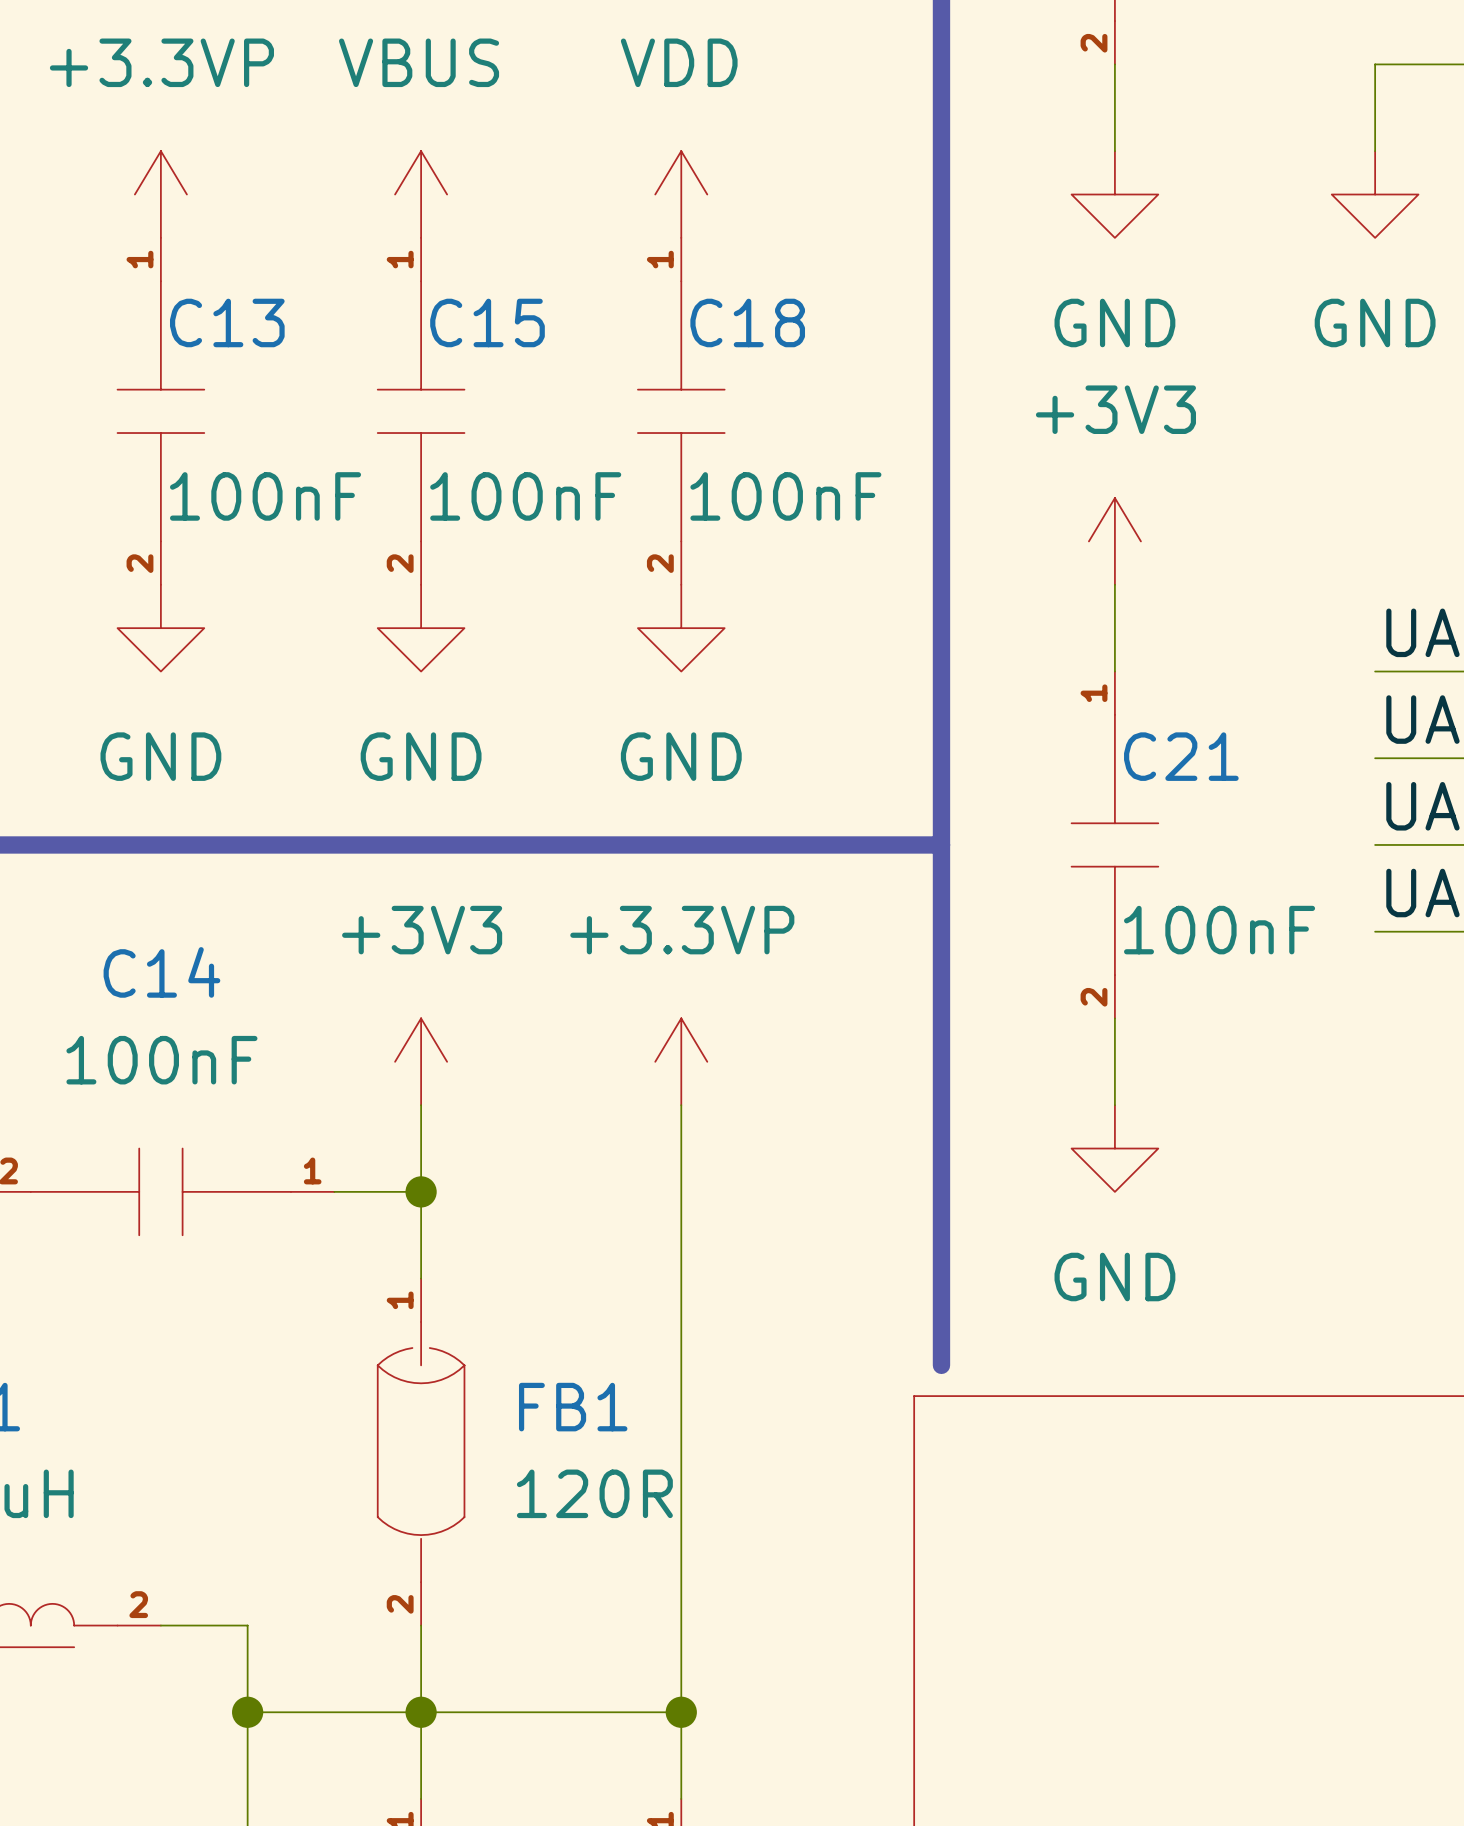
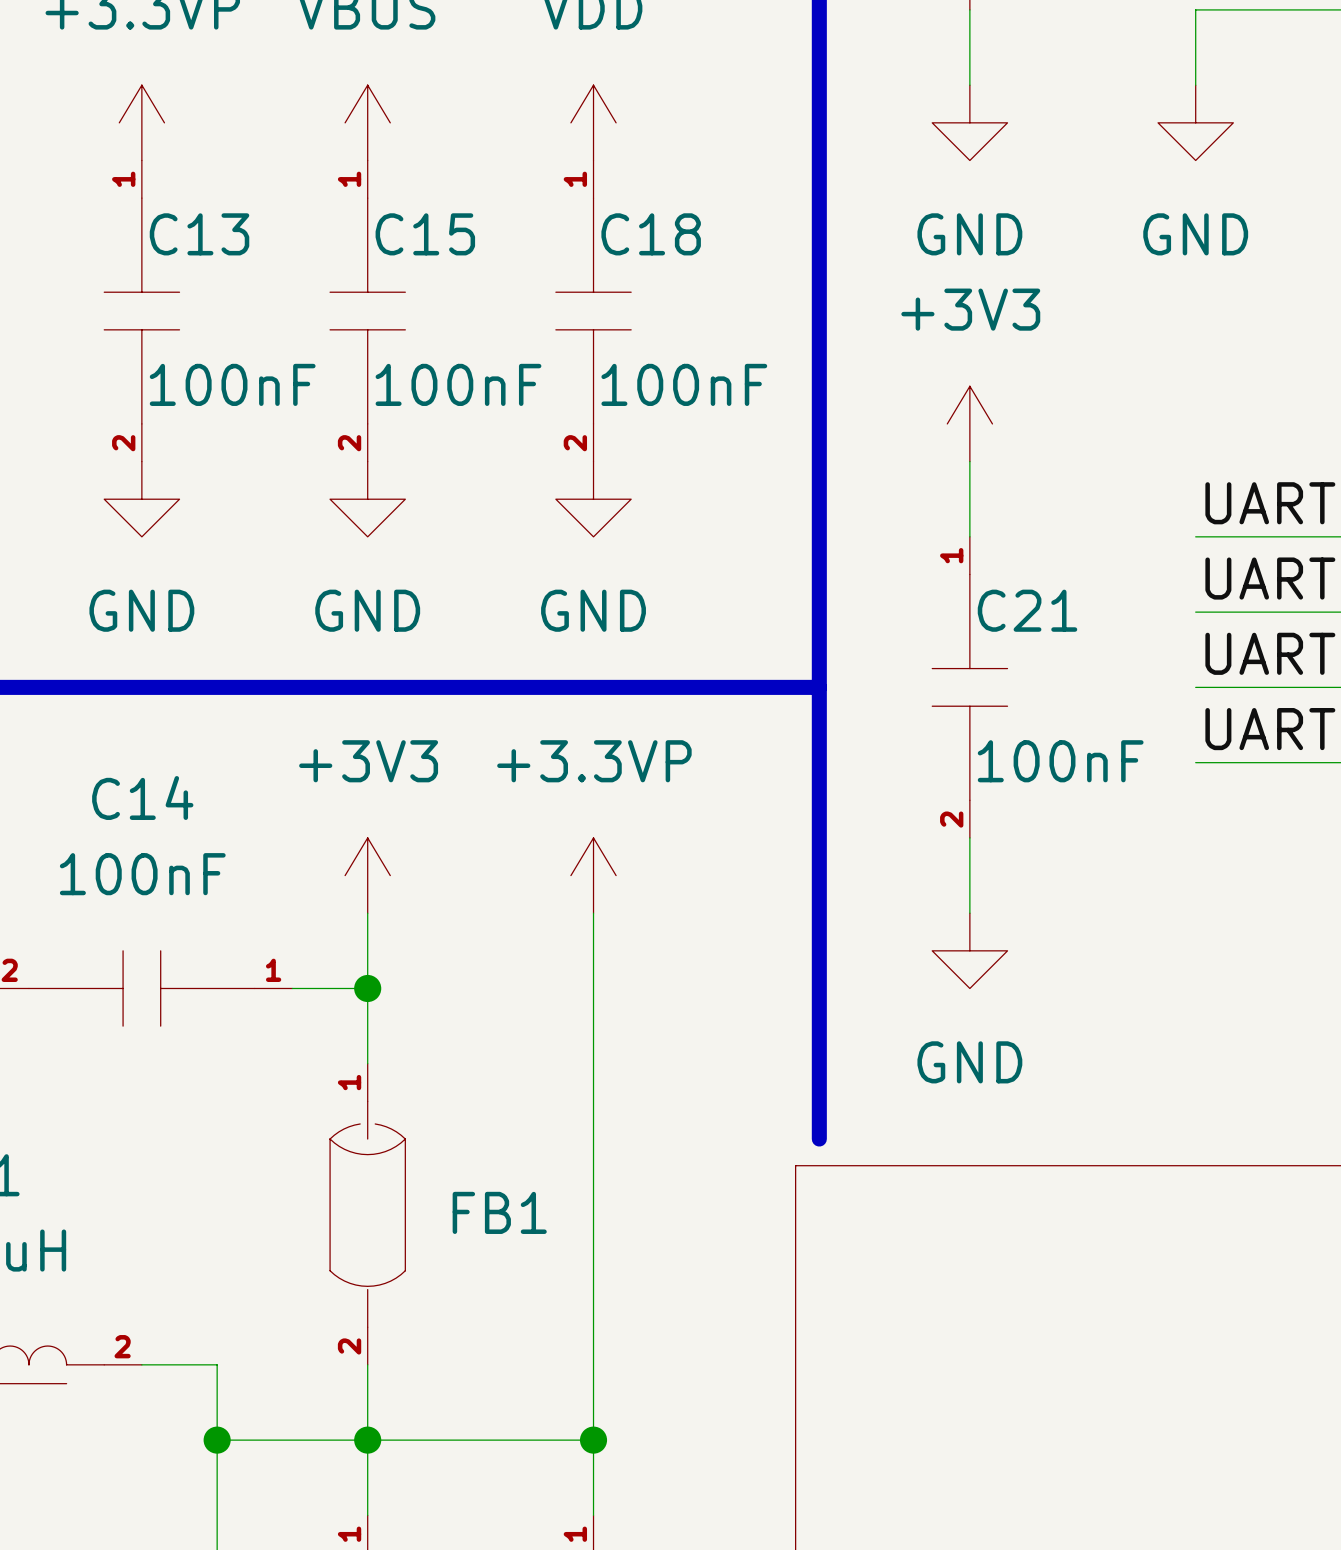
FB1 name position: FB1 (573, 1407) -> FB1 (499, 1212)
FB1 value: 120R (594, 1493) -> none

